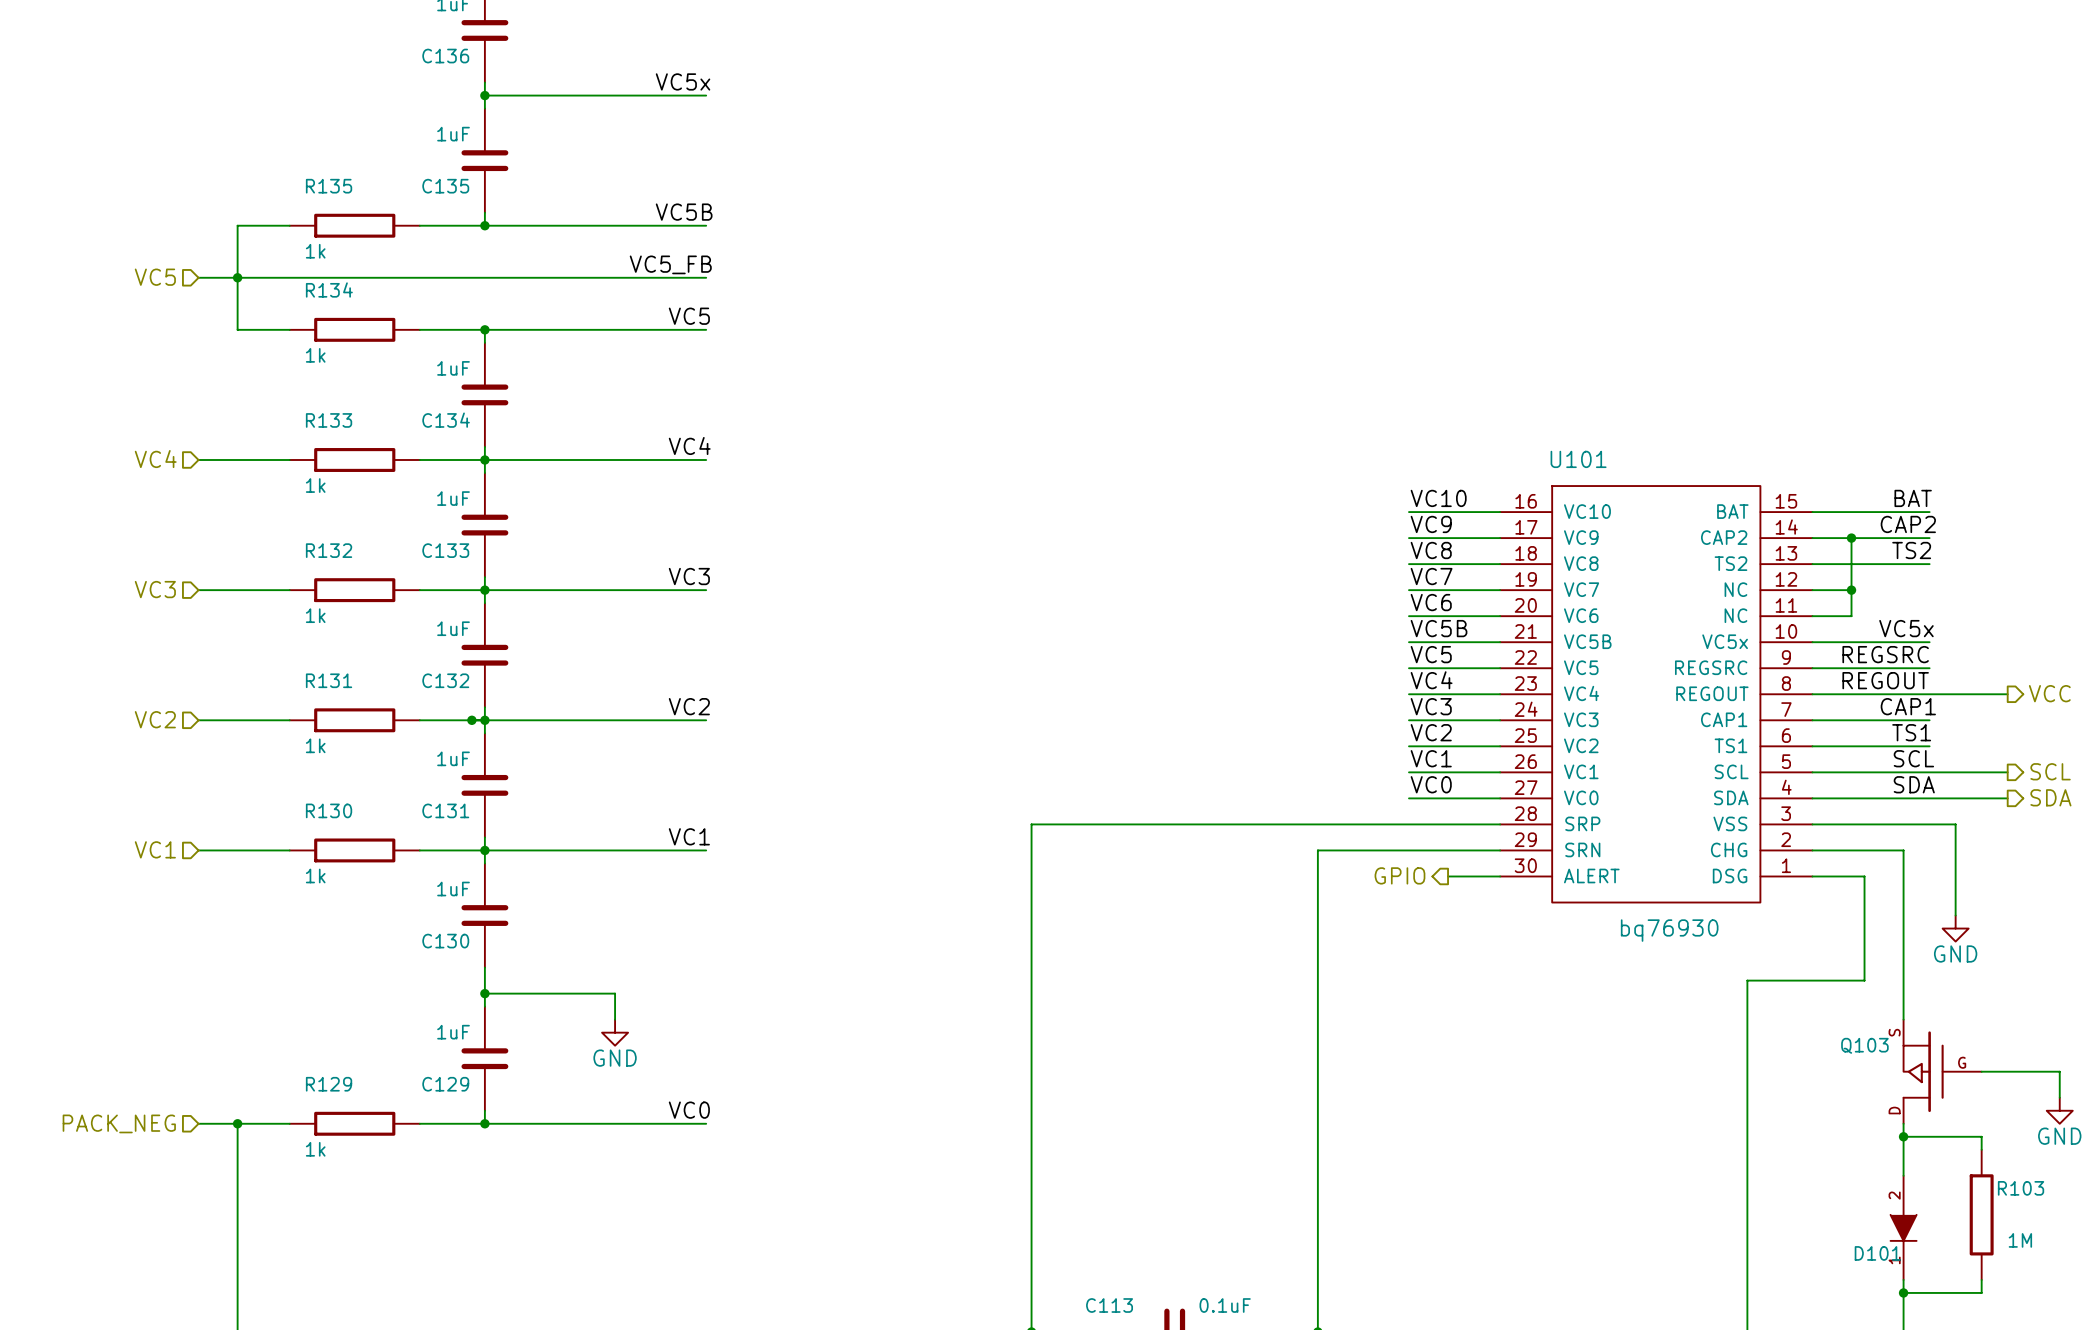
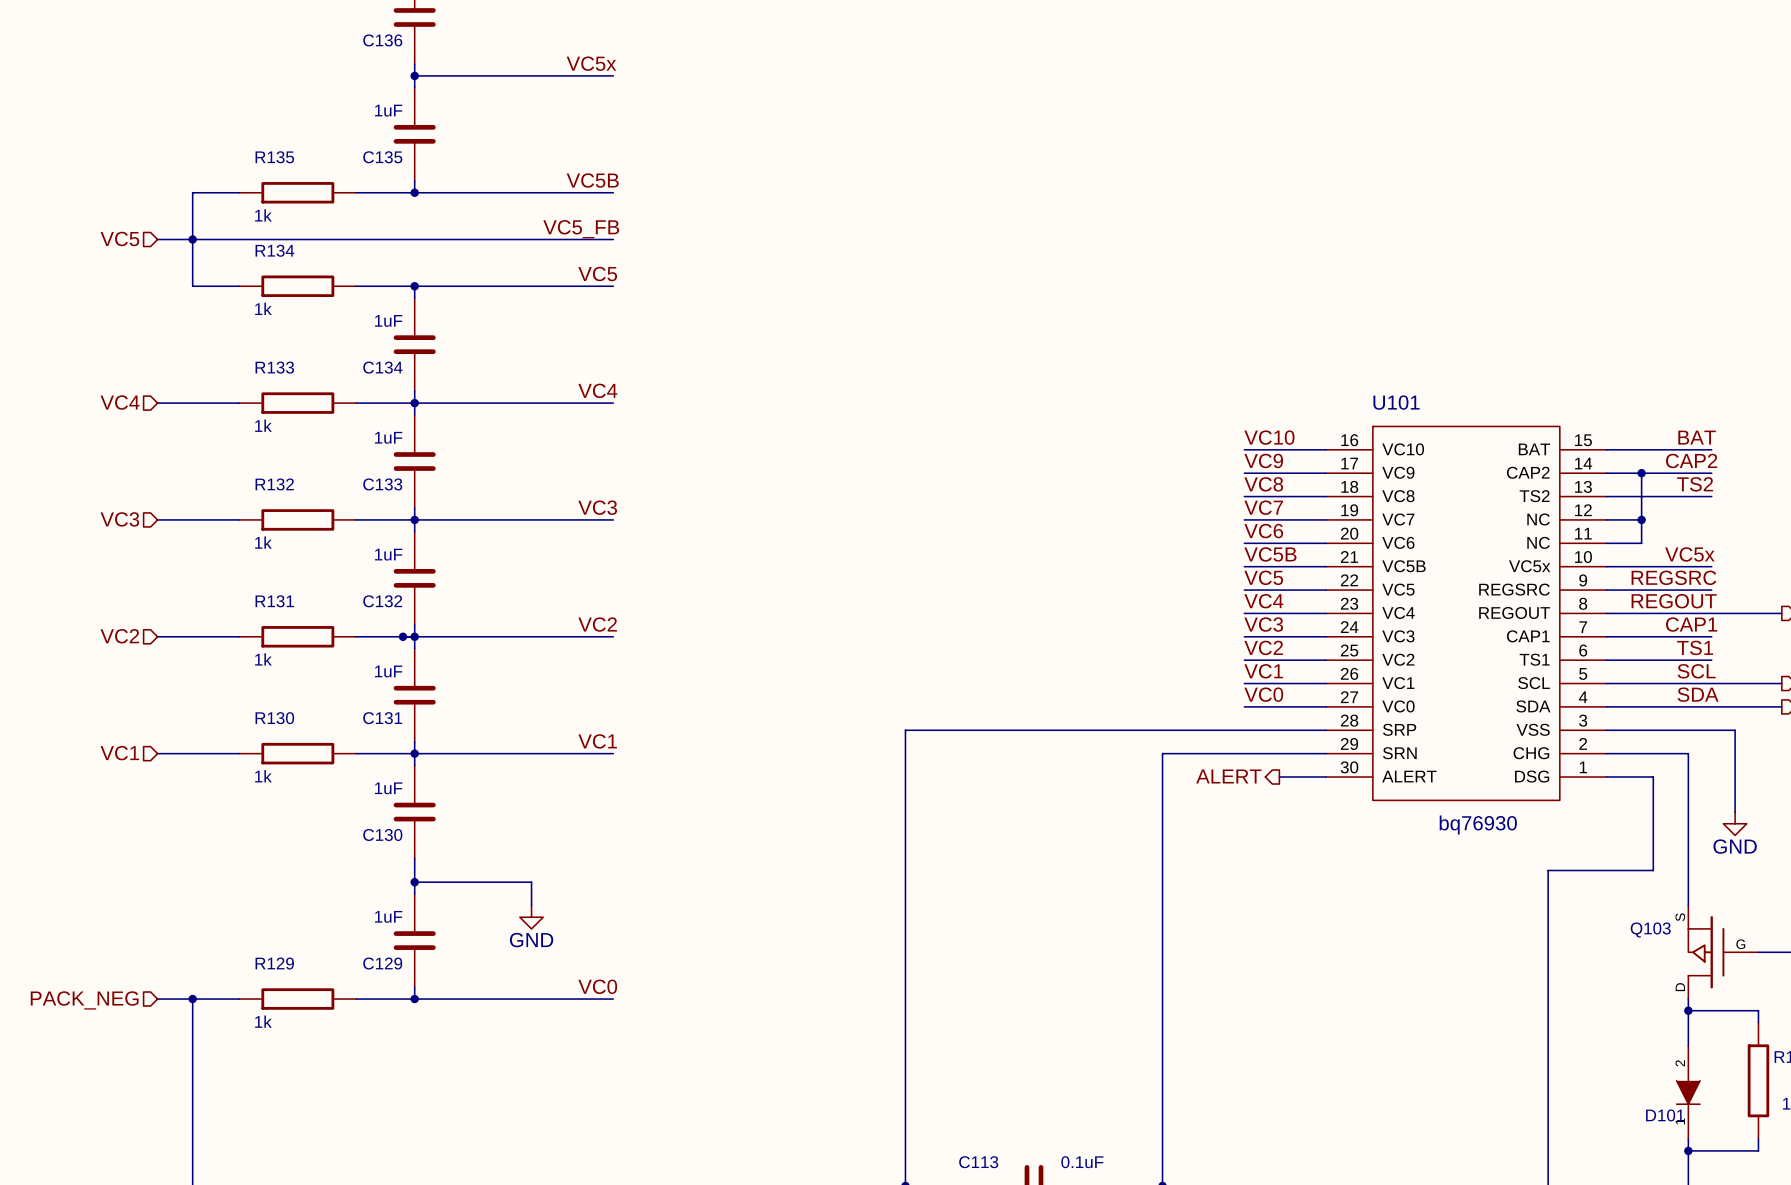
hierarchical label: GPIO (1399, 875) -> ALERT (1228, 776)

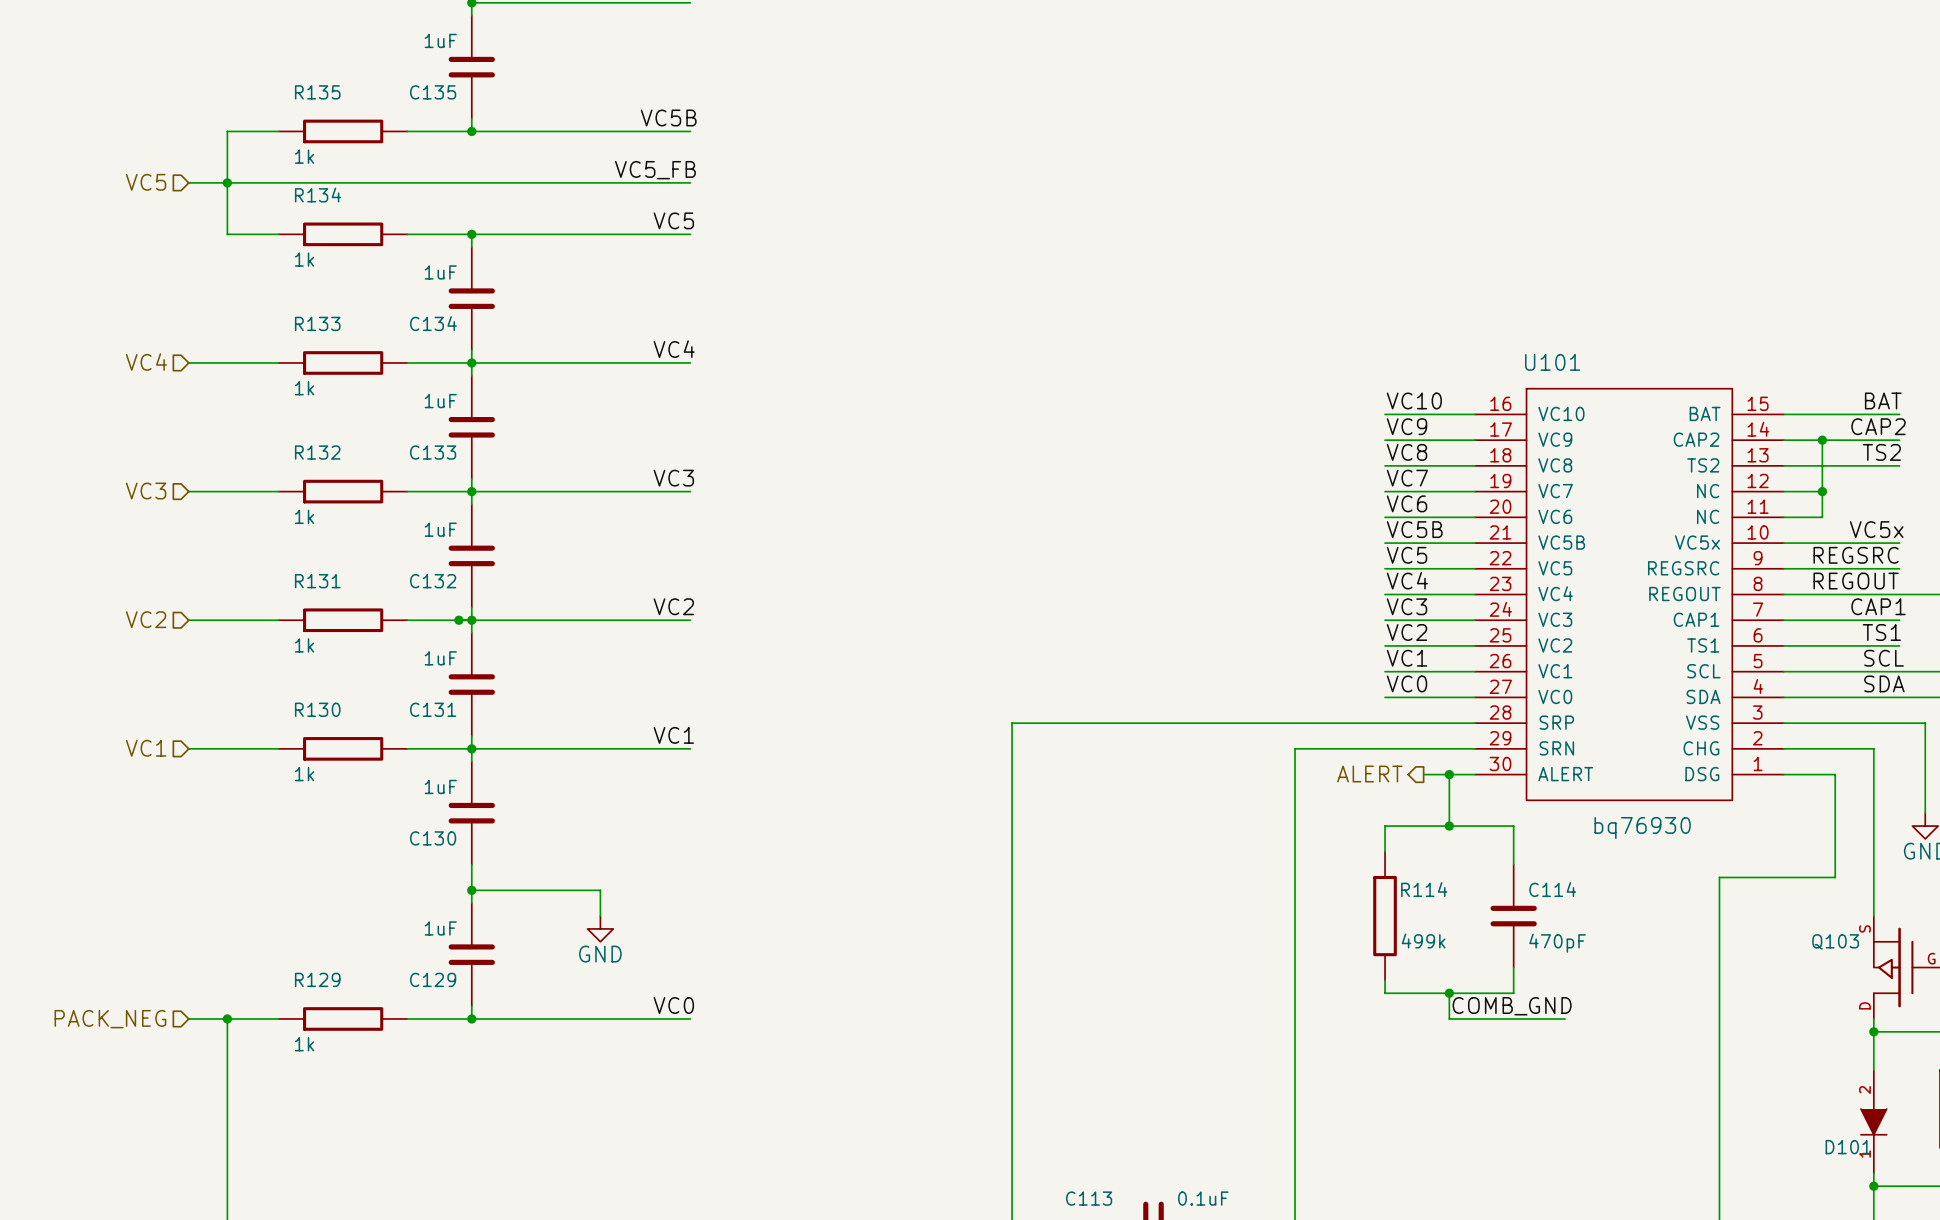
wire: none -> (1449, 774) (1449, 826)
junction: none -> (1449, 774)
junction: none -> (1449, 826)
wire: none -> (1385, 851) (1385, 826) (1513, 826) (1513, 864)
R114: none -> 499k (1385, 916)
C114: none -> 470pF (1513, 916)
wire: none -> (1513, 967) (1513, 993) (1385, 993) (1385, 980)
wire: none -> (1449, 993) (1449, 1018) (1565, 1018)
junction: none -> (1449, 993)
label: none -> COMB_GND (1512, 1006)

